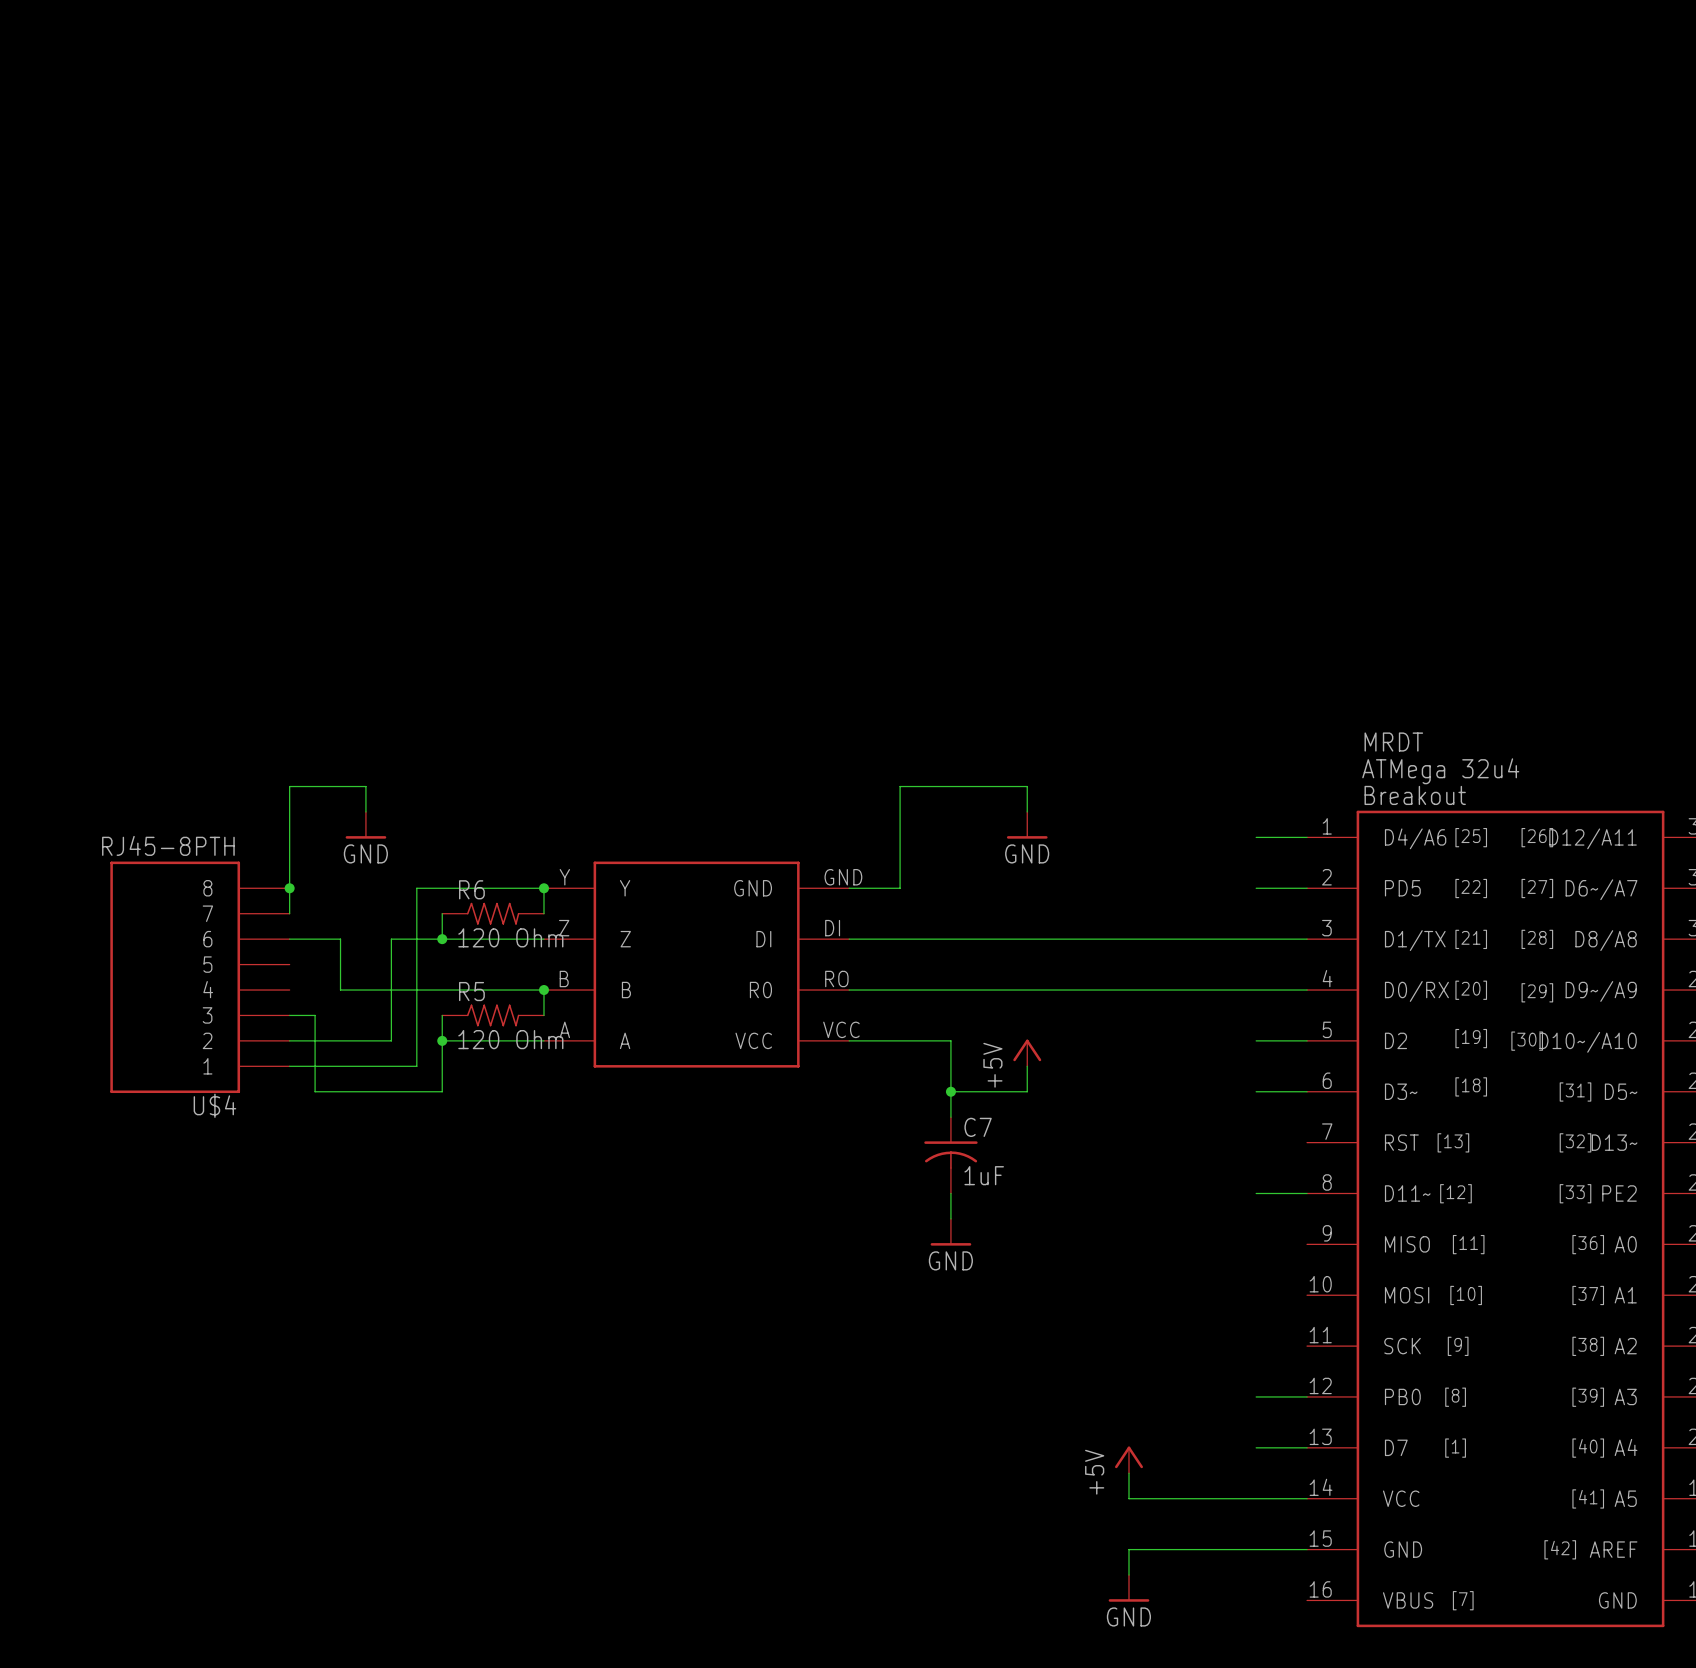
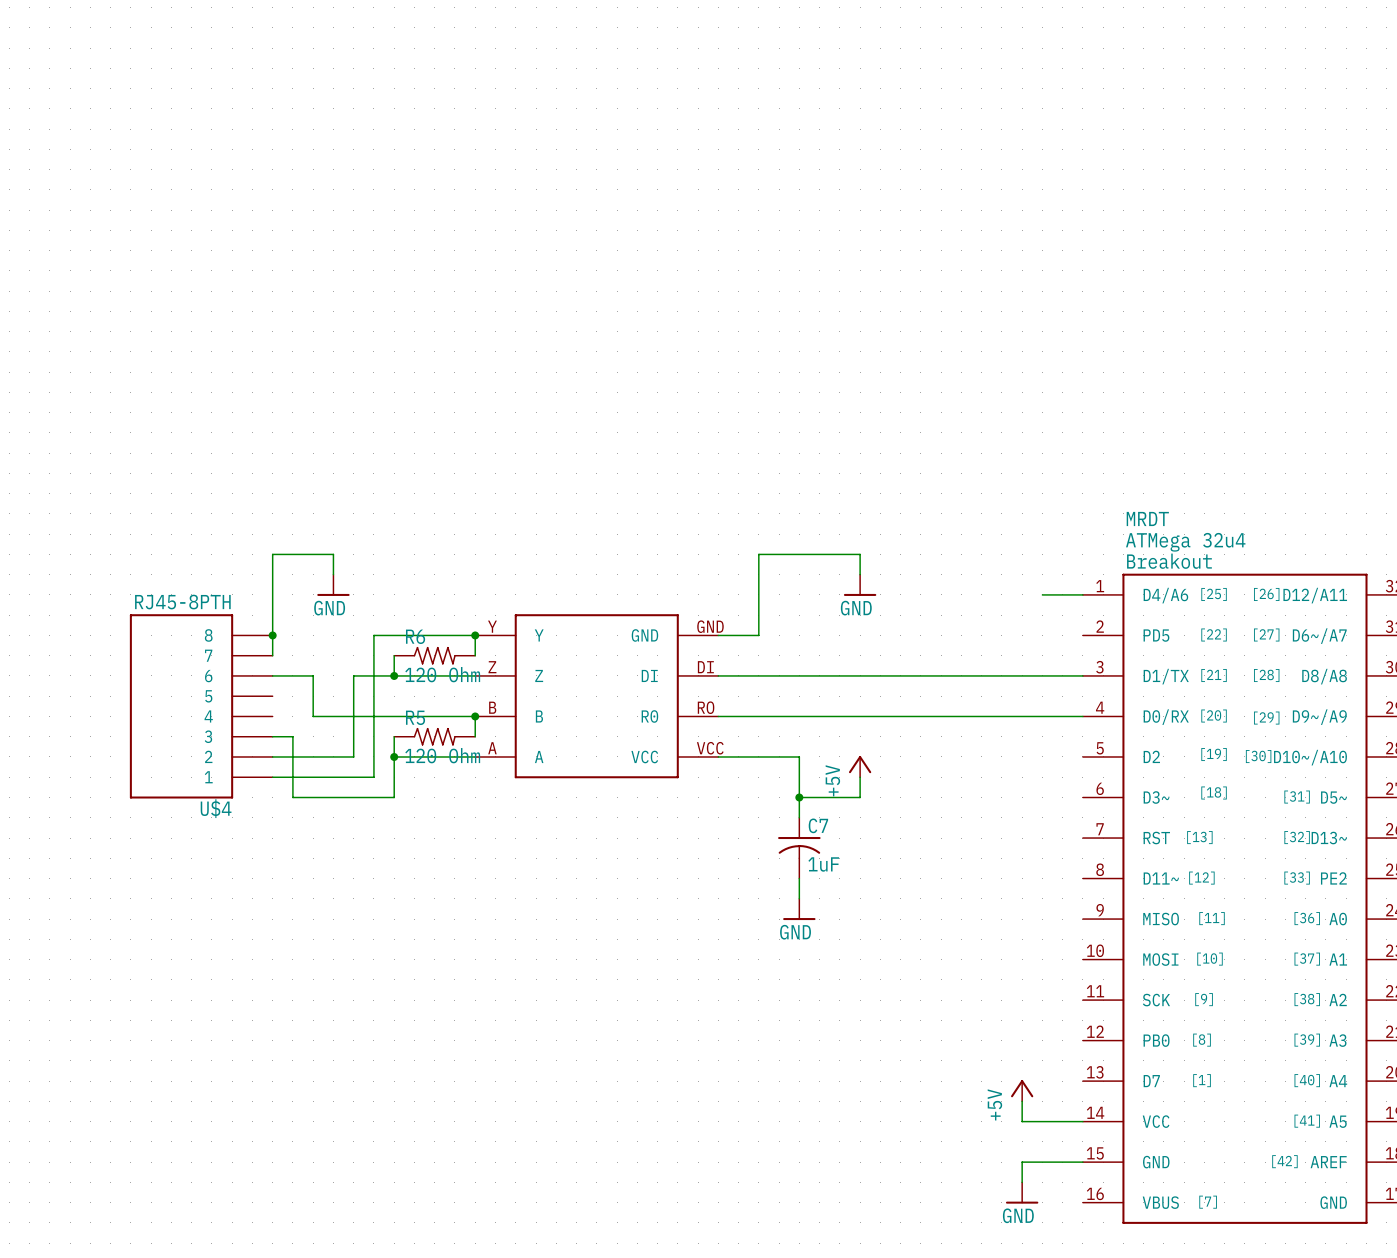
wire: (1256, 888) (1307, 888) -> none
wire: (1256, 1040) (1307, 1040) -> none
wire: (1256, 1091) (1307, 1091) -> none
wire: (1256, 1193) (1307, 1193) -> none
wire: (1256, 1396) (1307, 1396) -> none
wire: (1256, 1447) (1307, 1447) -> none
power symbol position: +5V (1128, 1459) -> +5V (1022, 1090)
wire: (1128, 1473) (1128, 1498) (1230, 1498) -> (1022, 1101) (1022, 1121)
wire: (1230, 1549) (1128, 1549) (1128, 1575) -> (1022, 1162) (1022, 1182)
power symbol position: GND (1128, 1588) -> GND (1022, 1193)

